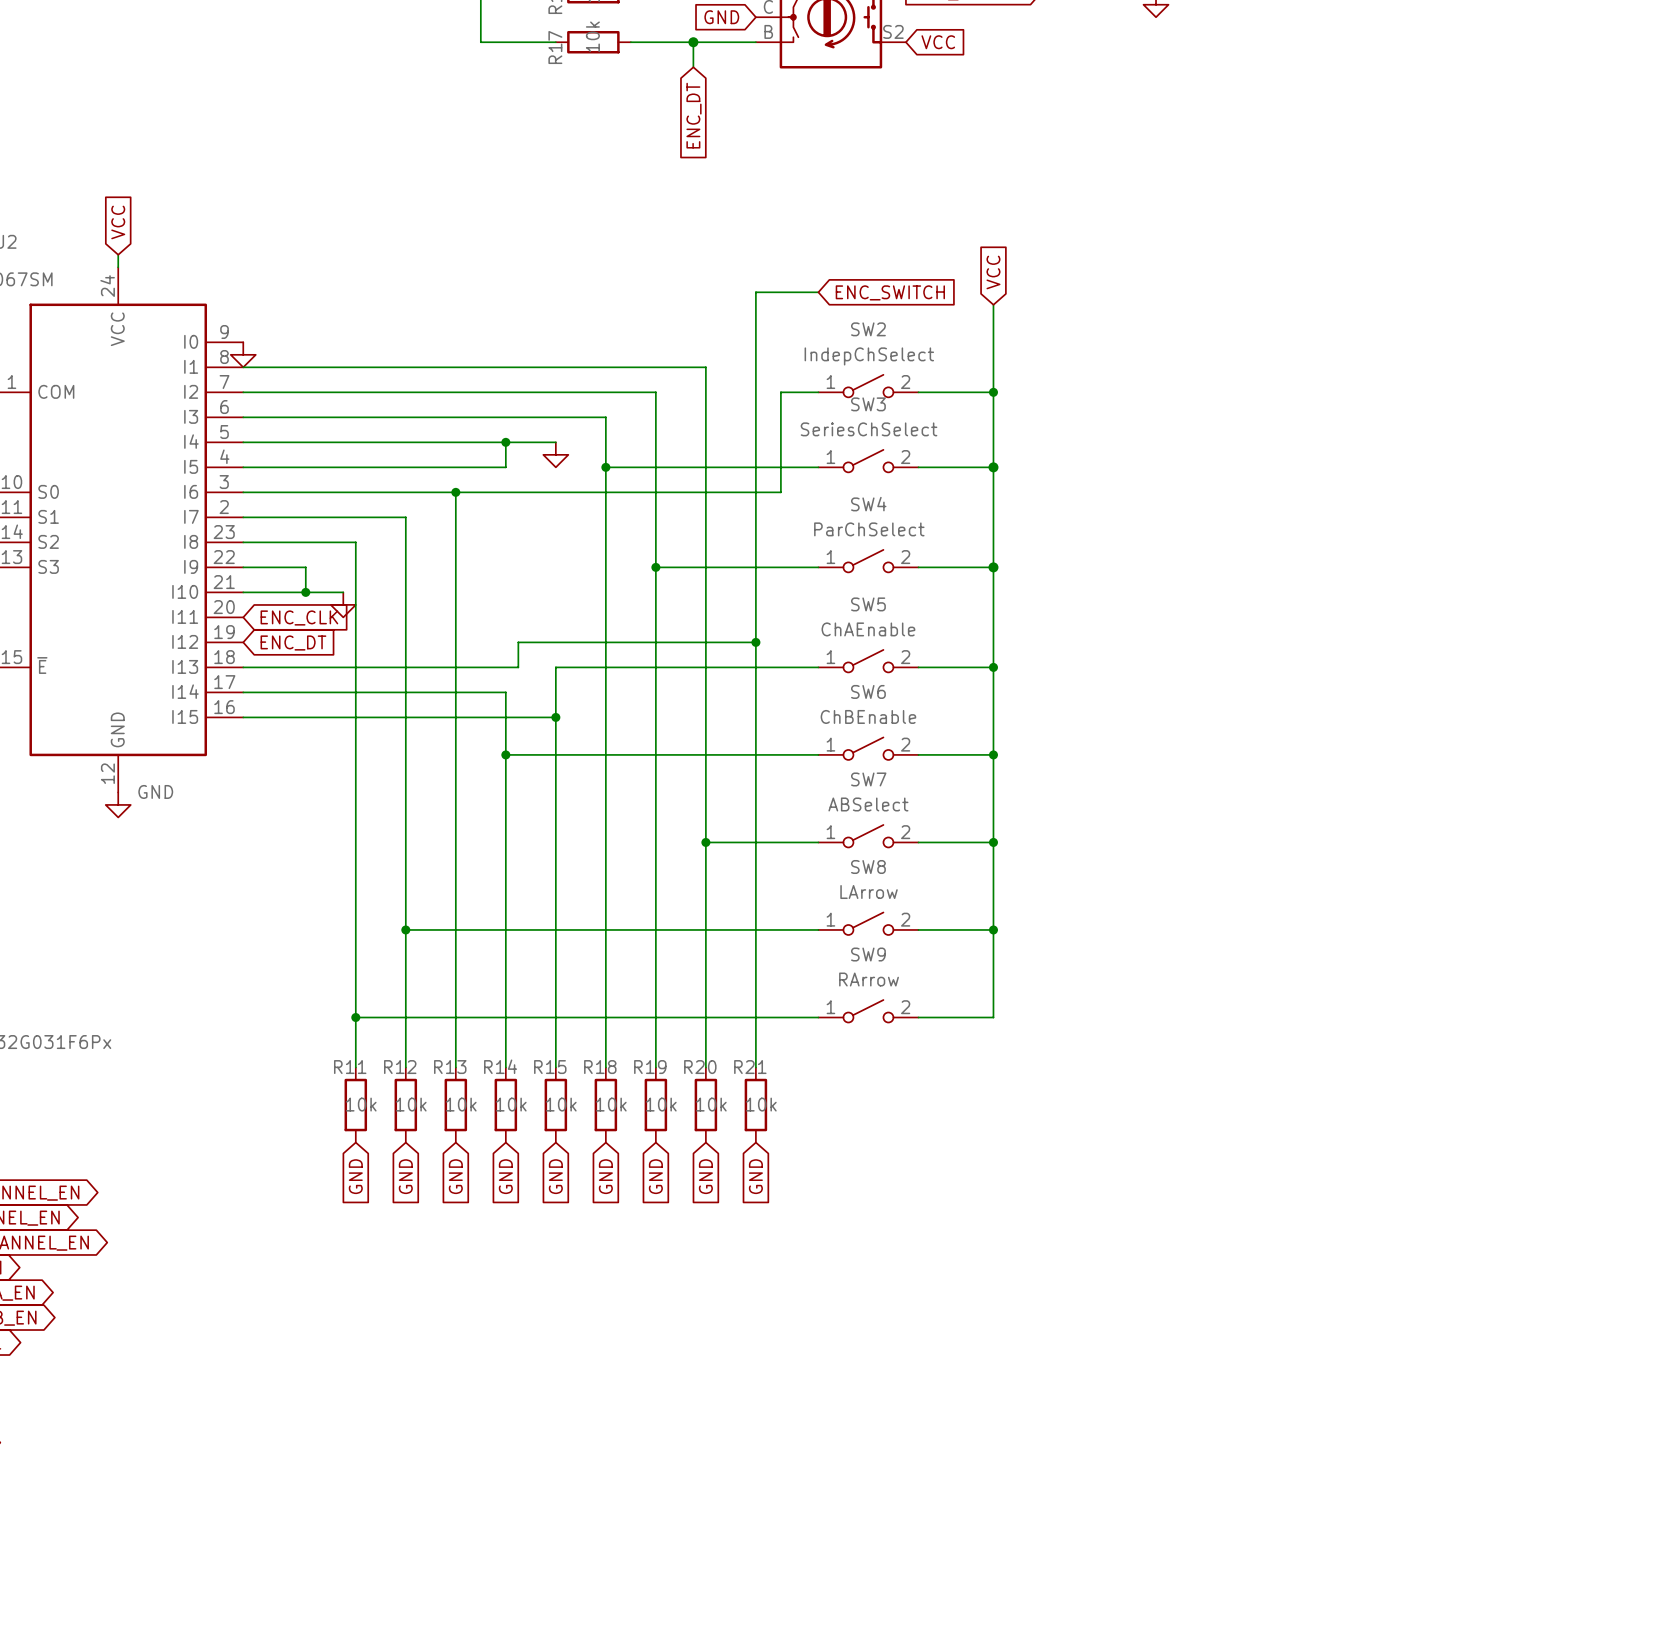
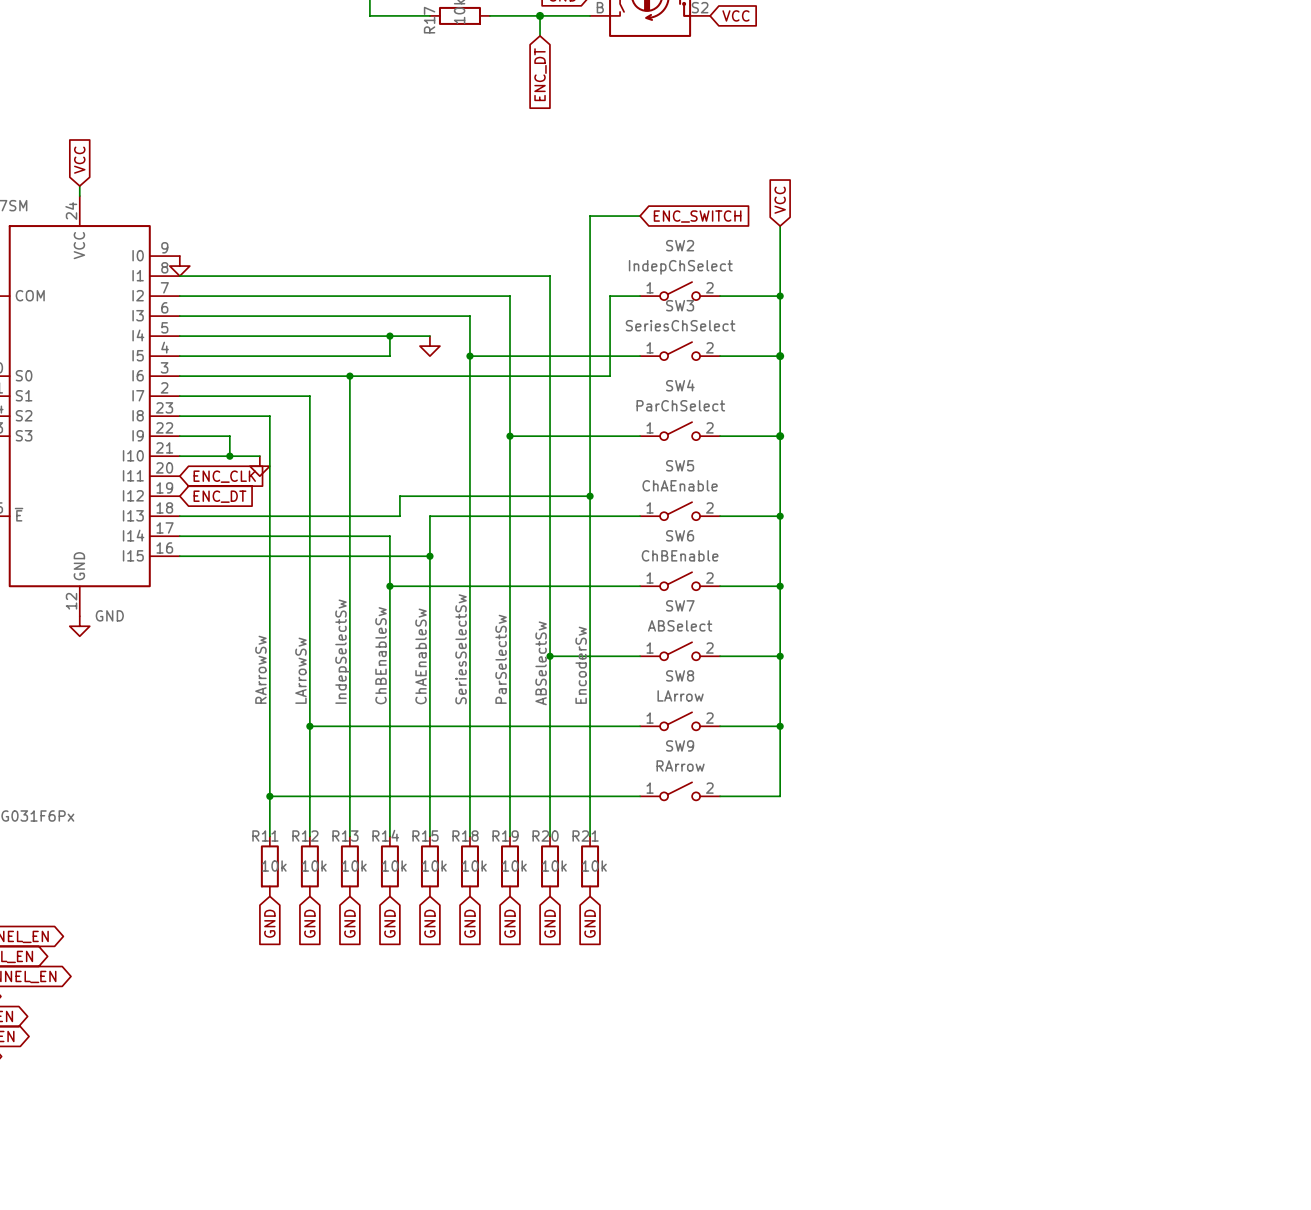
label: none -> SeriesSelectSw (461, 649)
label: none -> IndepSelectSw (342, 651)
label: none -> ChBEnableSw (381, 655)
label: none -> ChAEnableSw (421, 656)
label: none -> ParSelectSw (501, 659)
label: none -> ABSelectSw (541, 663)
label: none -> EncoderSw (581, 665)
label: none -> RArrowSw (260, 669)
label: none -> LArrowSw (300, 670)

